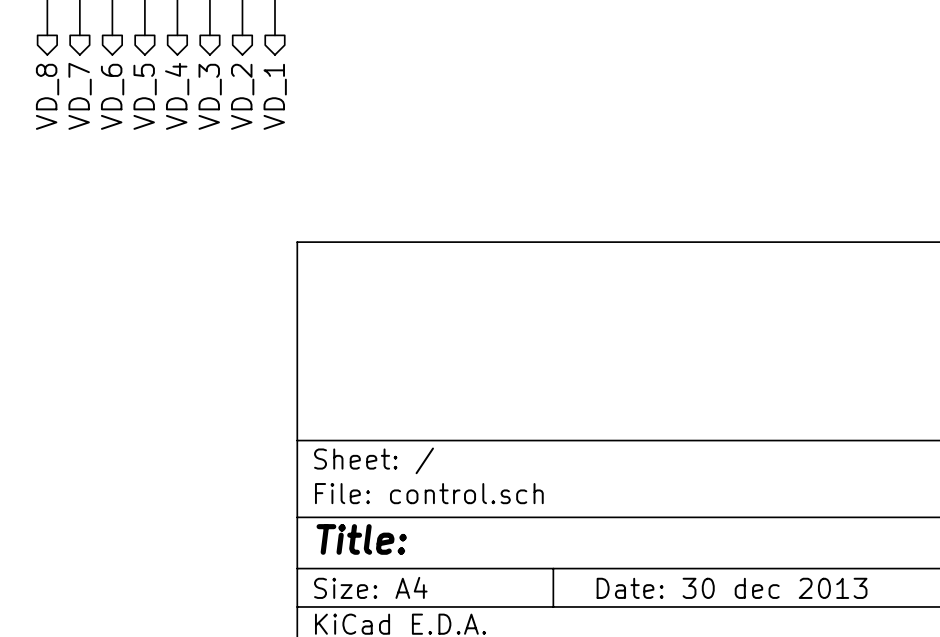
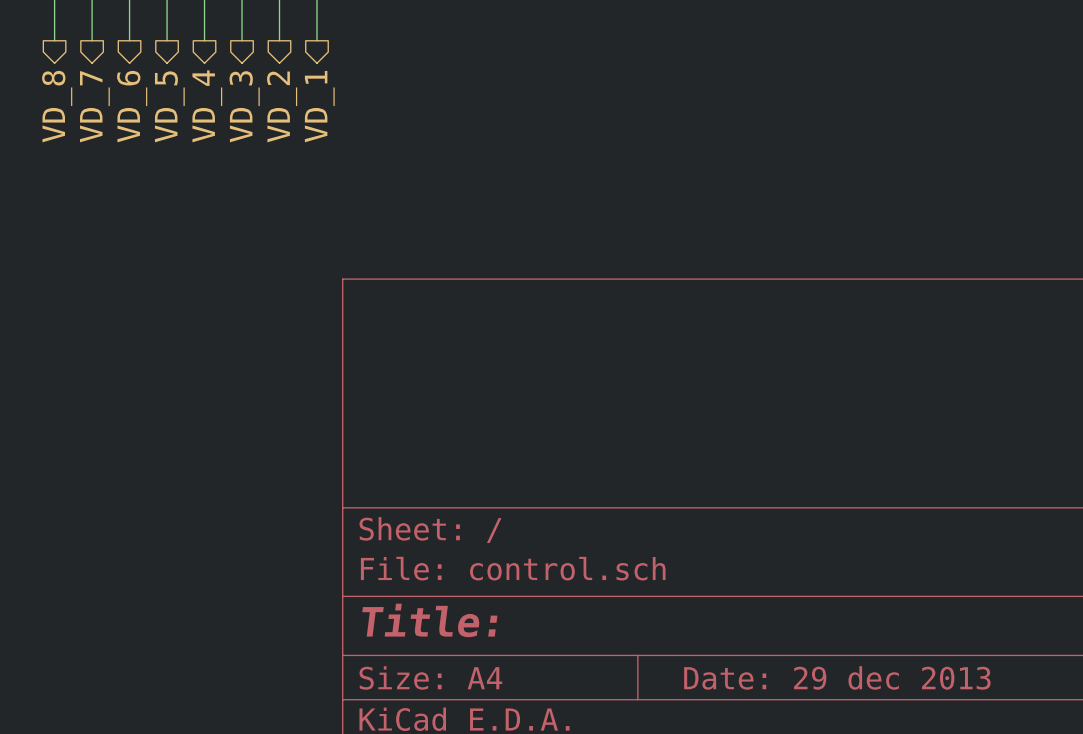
title block: Date: 30 dec 2013 (732, 588) -> Date: 29 dec 2013 (837, 677)

